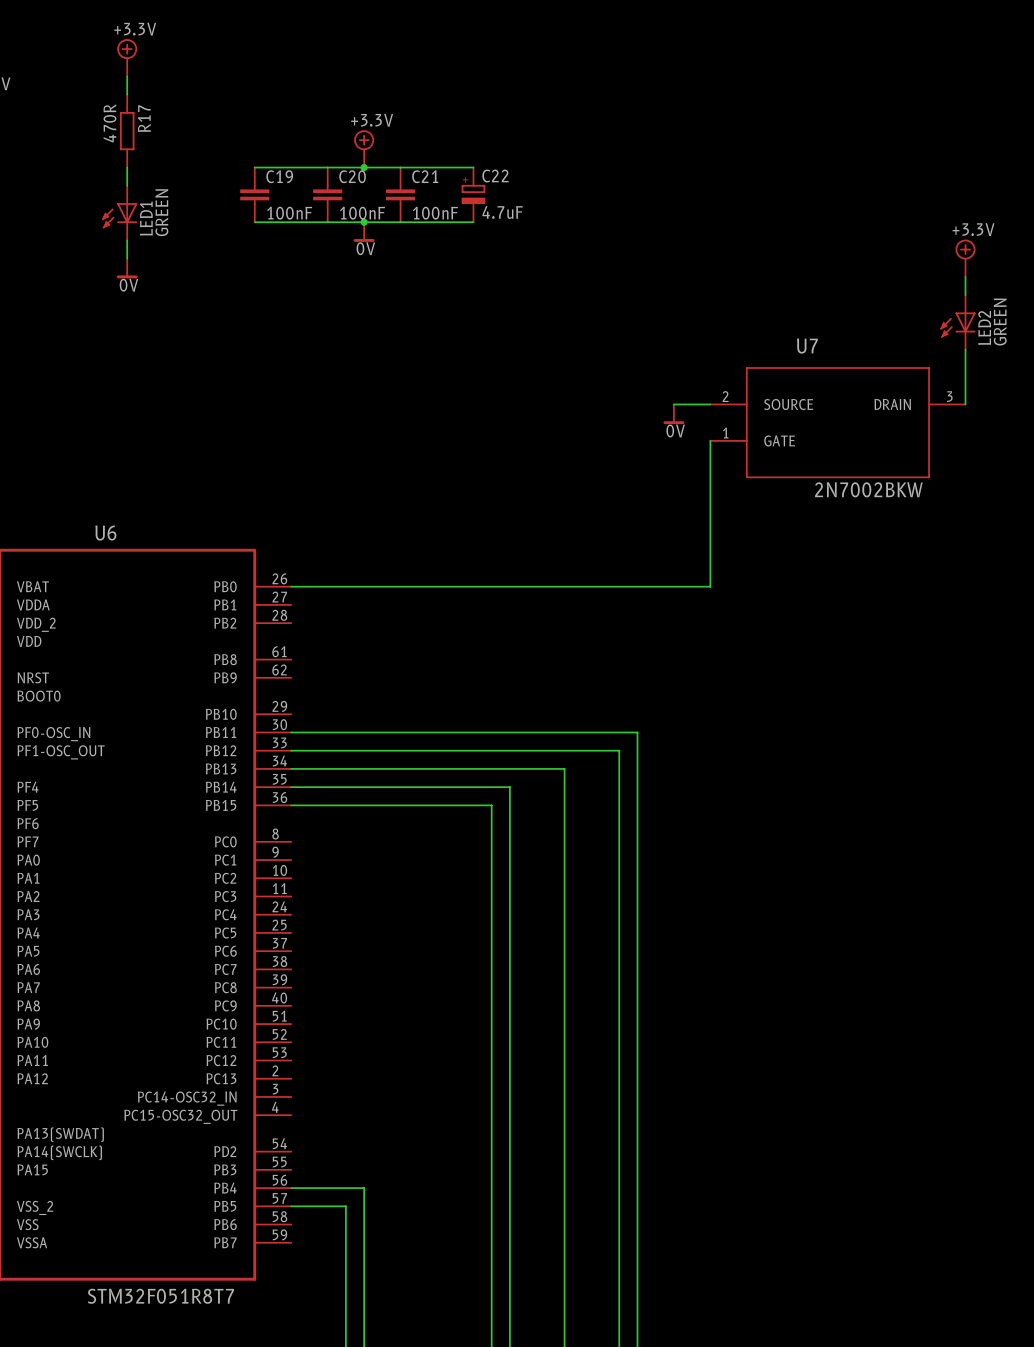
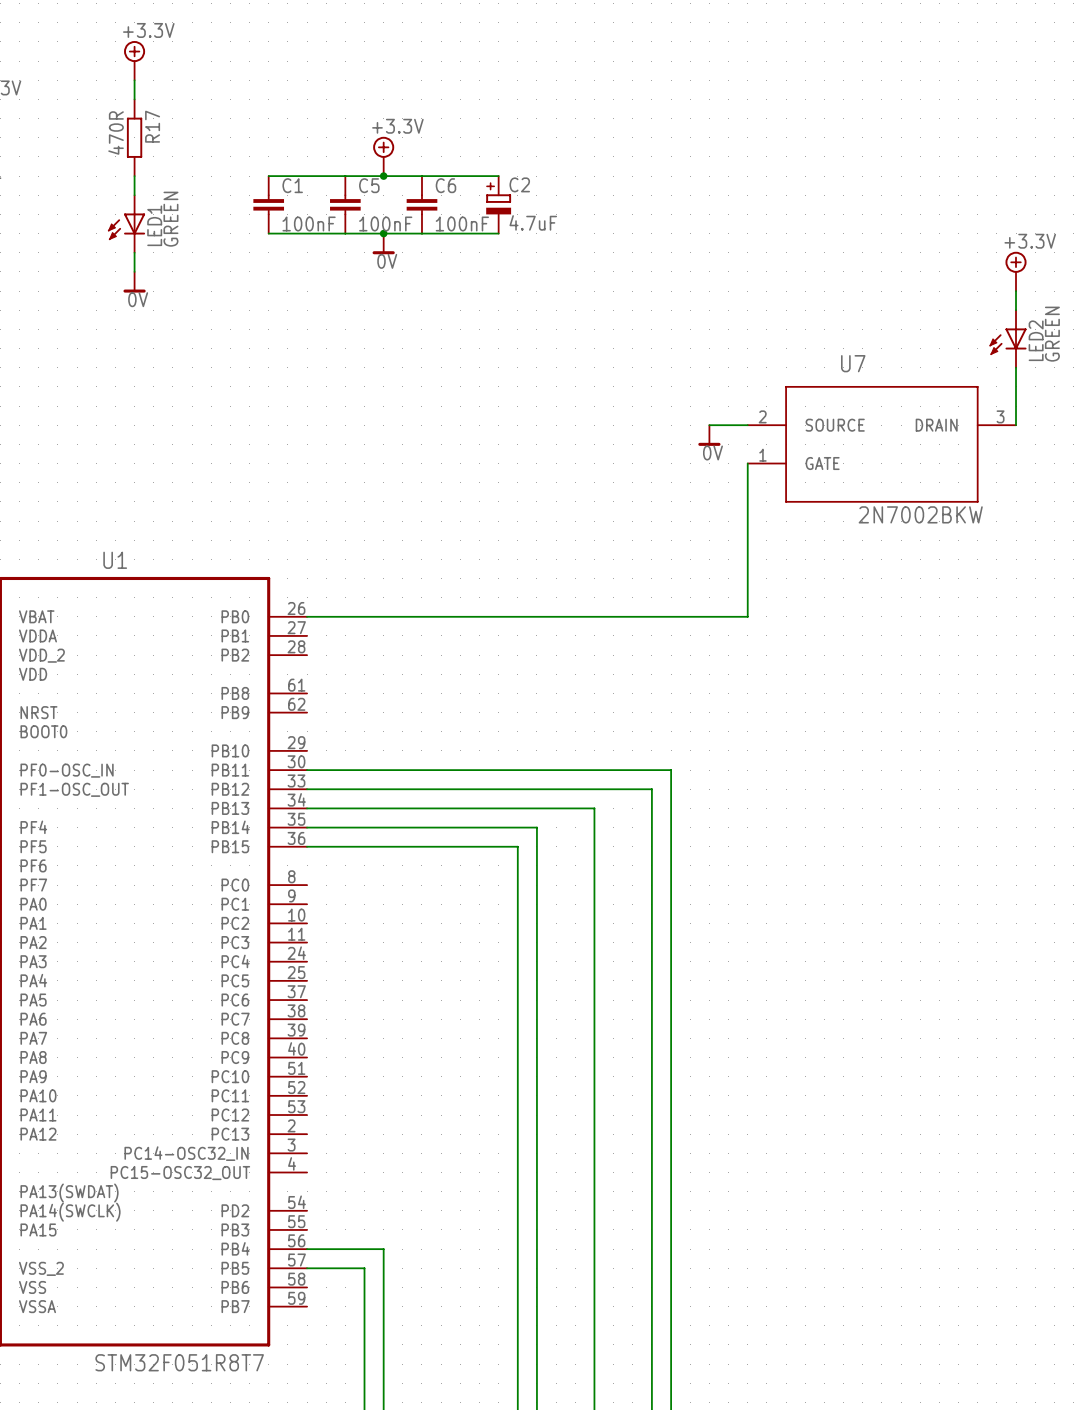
C19 name: C19 (279, 176) -> C1 (292, 185)
C20 name: C20 (352, 176) -> C5 (369, 185)
C21 name: C21 (425, 176) -> C6 (445, 185)
C22 name: C22 (495, 176) -> C2 (519, 184)
U6 name: U6 (105, 533) -> U1 (115, 560)

